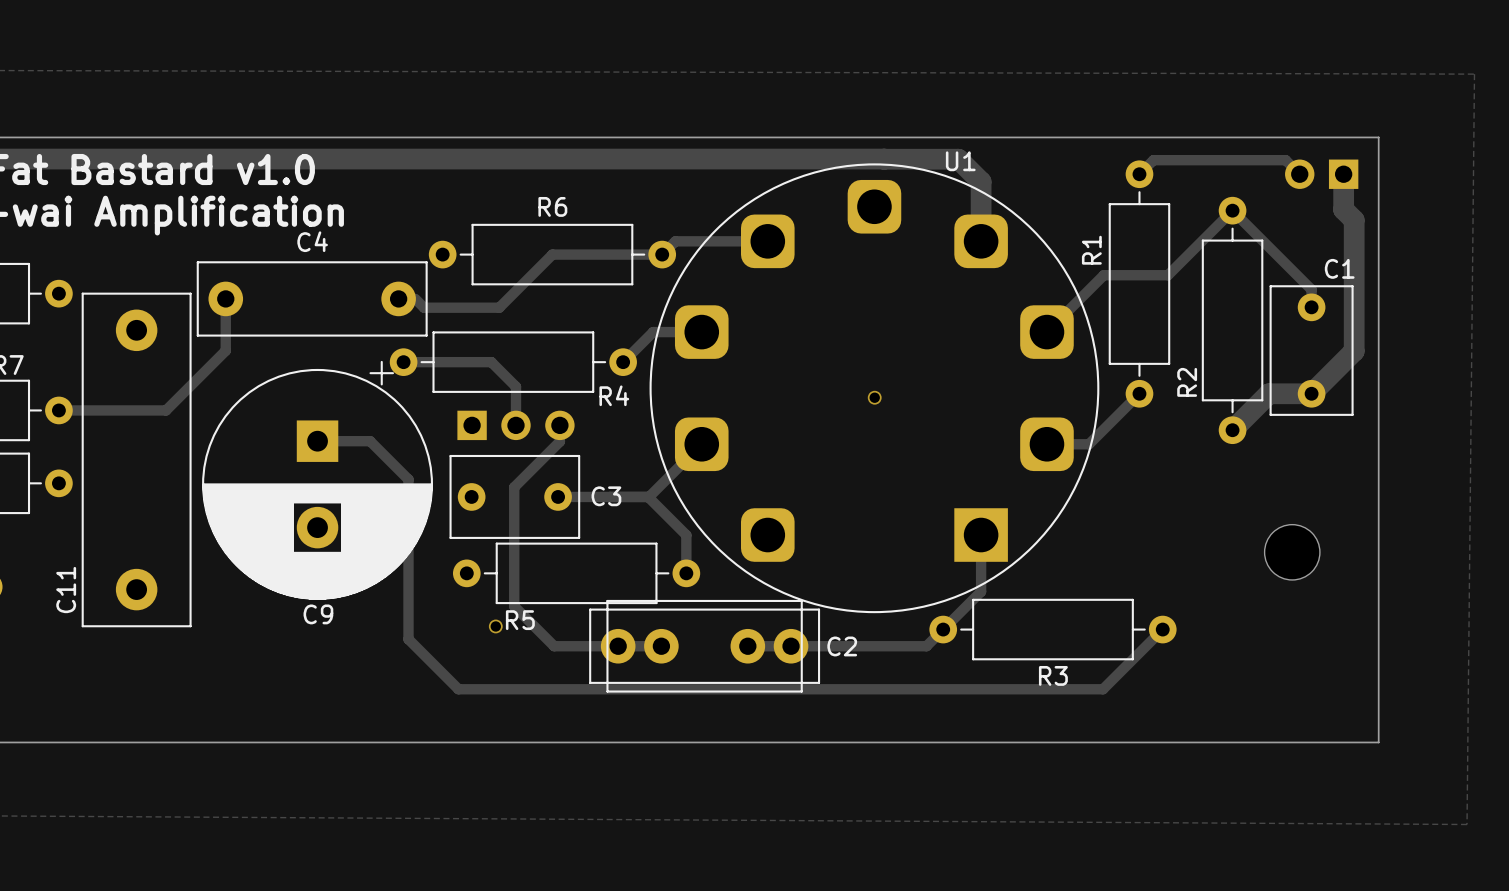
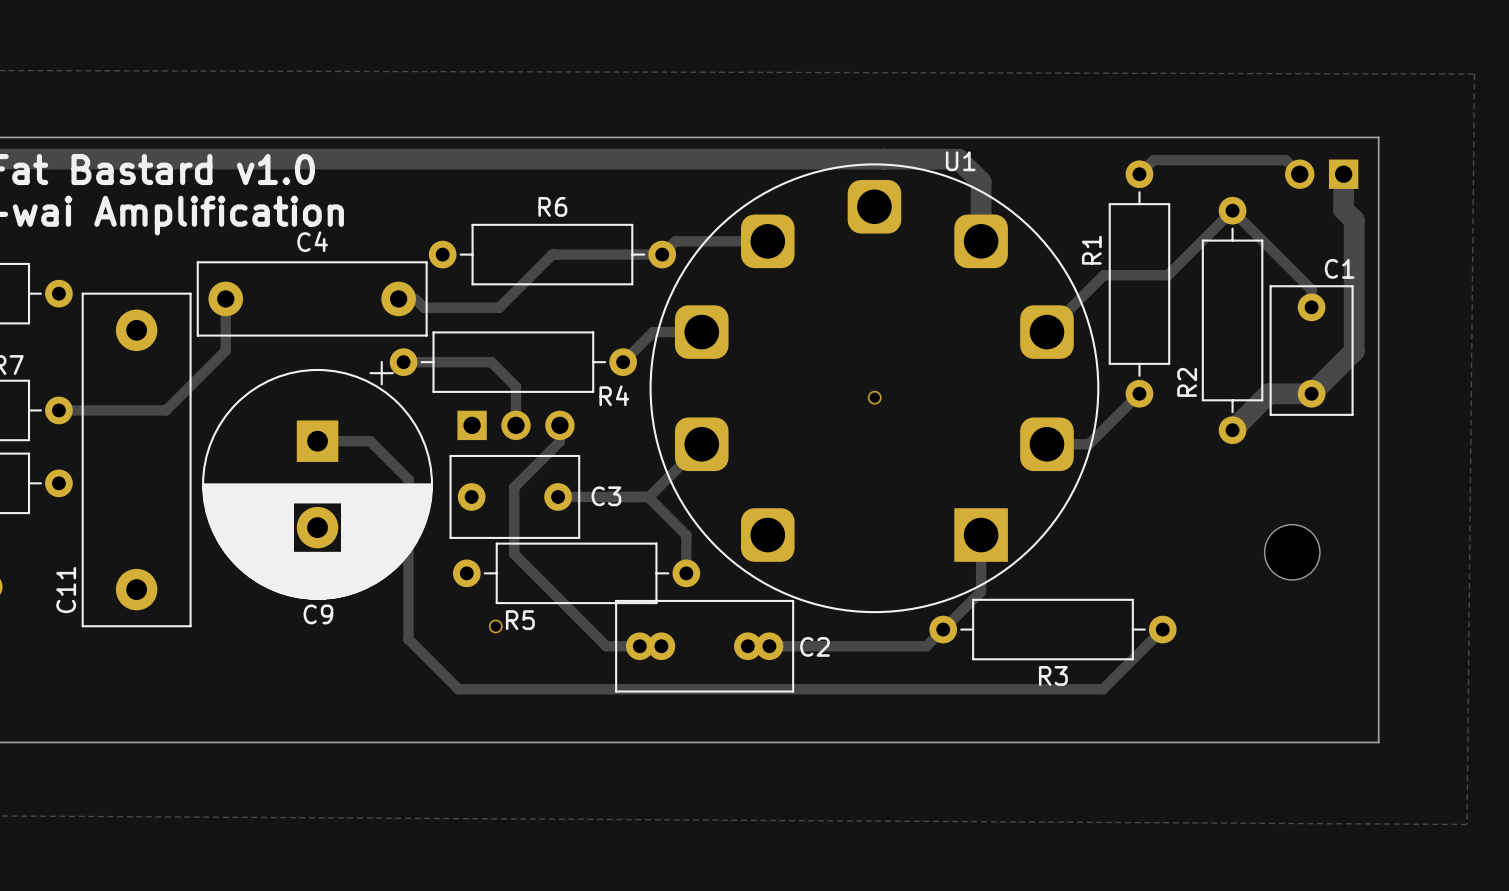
track: (514, 554) (514, 606) (554, 646) (606, 646) -> (514, 554) (606, 646)
C2 footprint: [606, 599, 803, 693] -> [615, 599, 795, 693]
part: (704, 646) -> none

